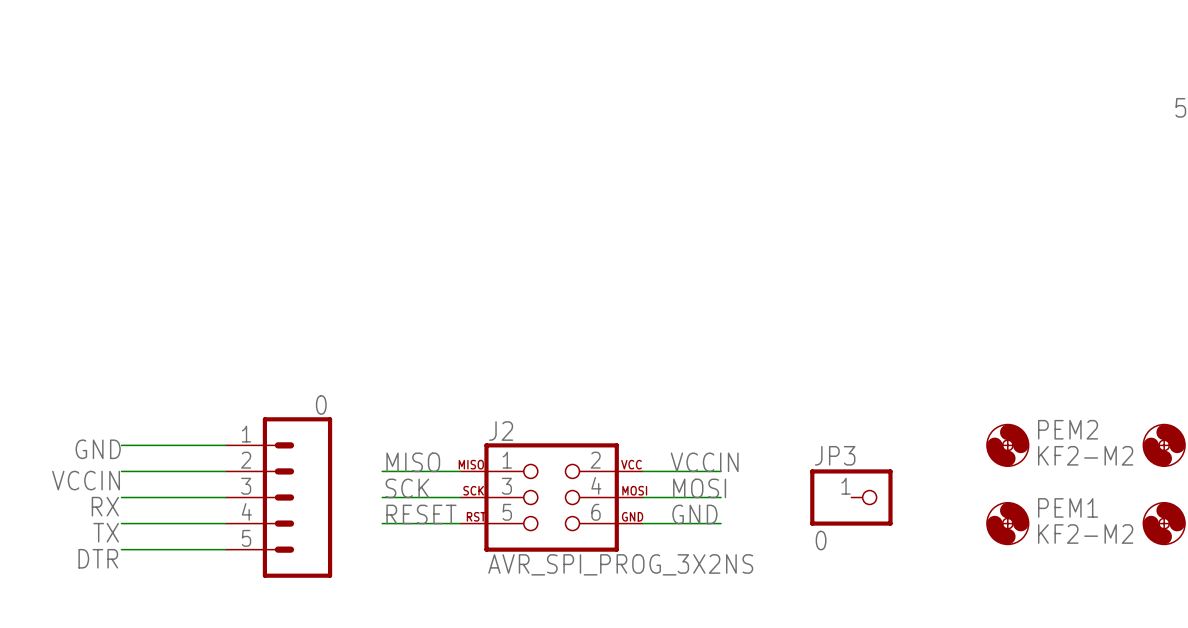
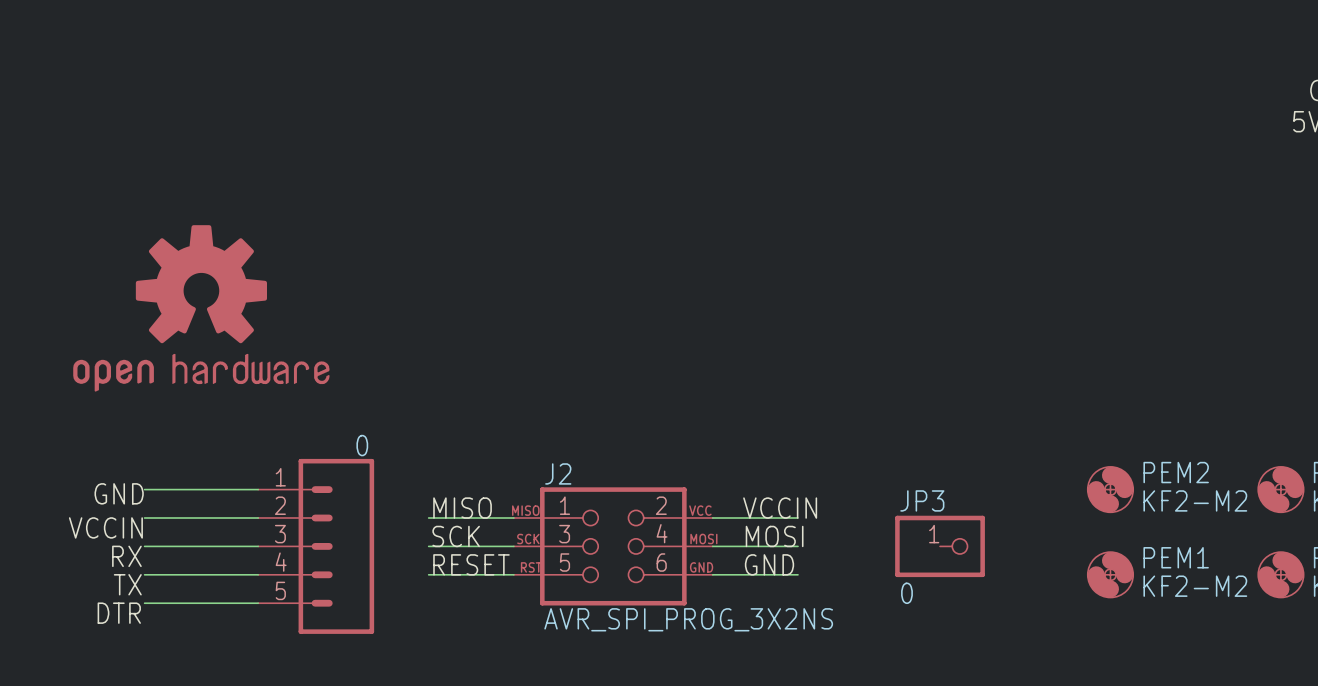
part: none -> (201, 308)

